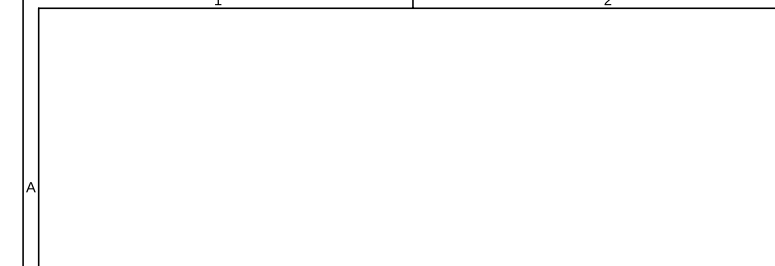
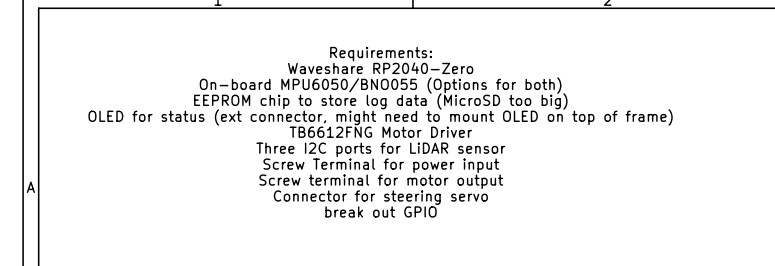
text: none -> Requirements: (381, 54)
text: none -> Waveshare RP2040-Zero (380, 68)
text: none -> On-board MPU6050/BNO055 (Options for both) (380, 85)
text: none -> EEPROM chip to store log data (MicroSD too big) (380, 101)
text: none -> OLED for status (ext connector, might need to mount OLED on top of frame) (380, 117)
text: none -> TB6612FNG Motor Driver (380, 132)
text: none -> Three I2C ports for LiDAR sensor (380, 149)
text: none -> Screw Terminal for power input (381, 165)
text: none -> Screw terminal for motor output (381, 181)
text: none -> Connector for steering servo (380, 197)
text: none -> break out GPIO (381, 211)

